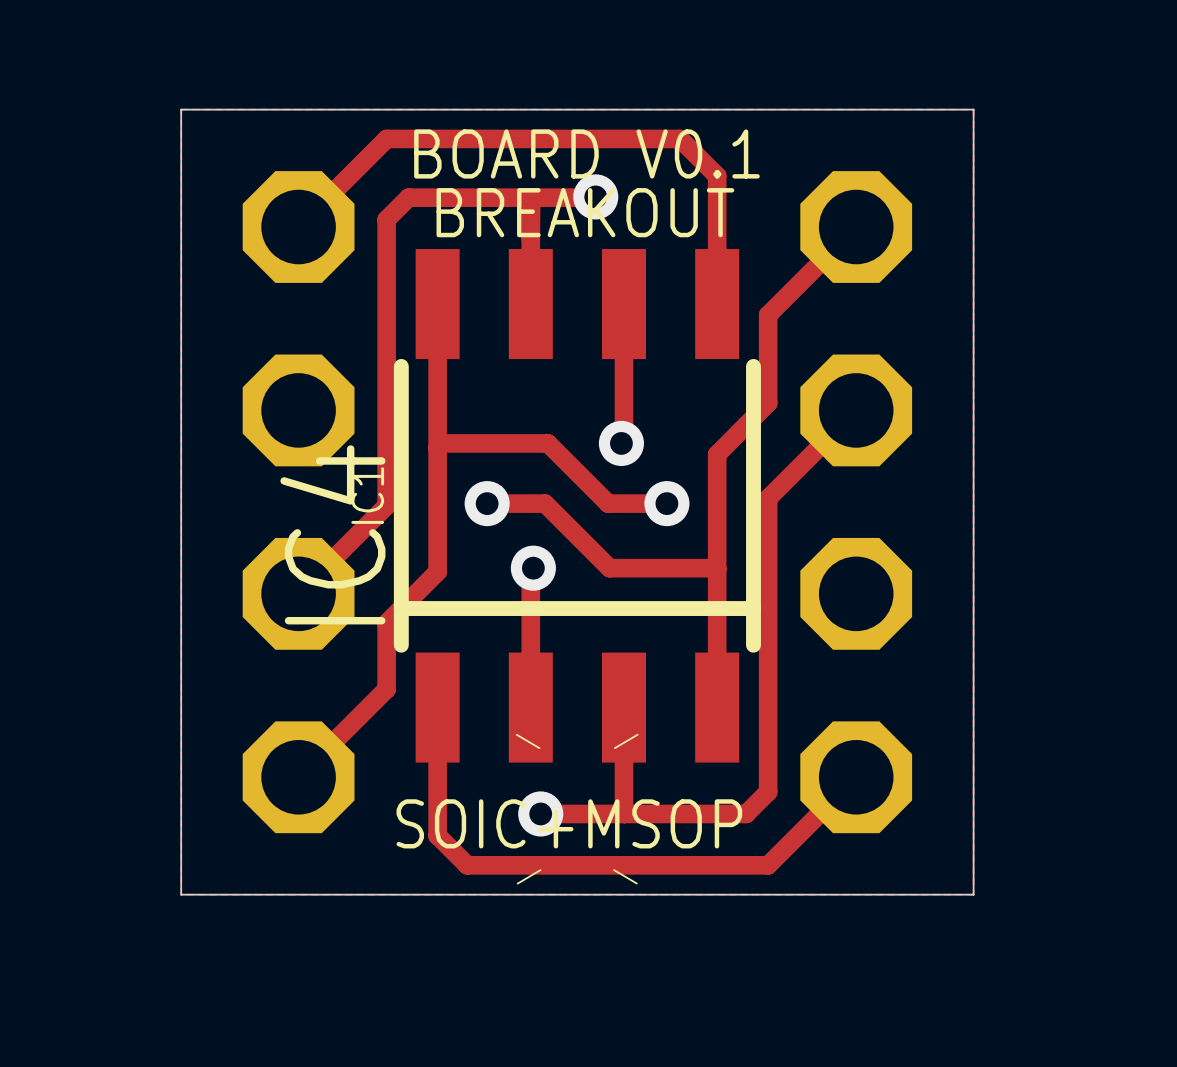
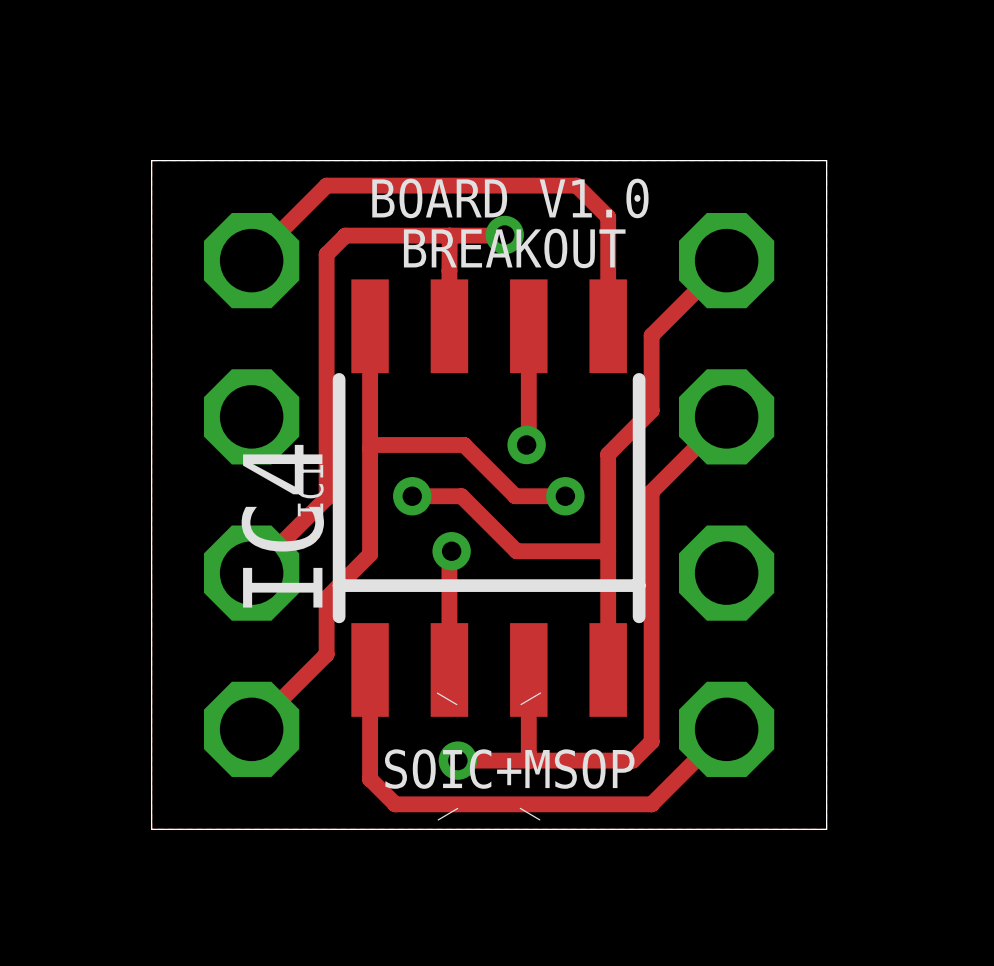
text: BOARD V0.1 (586, 153) -> BOARD V1.0 (510, 198)

